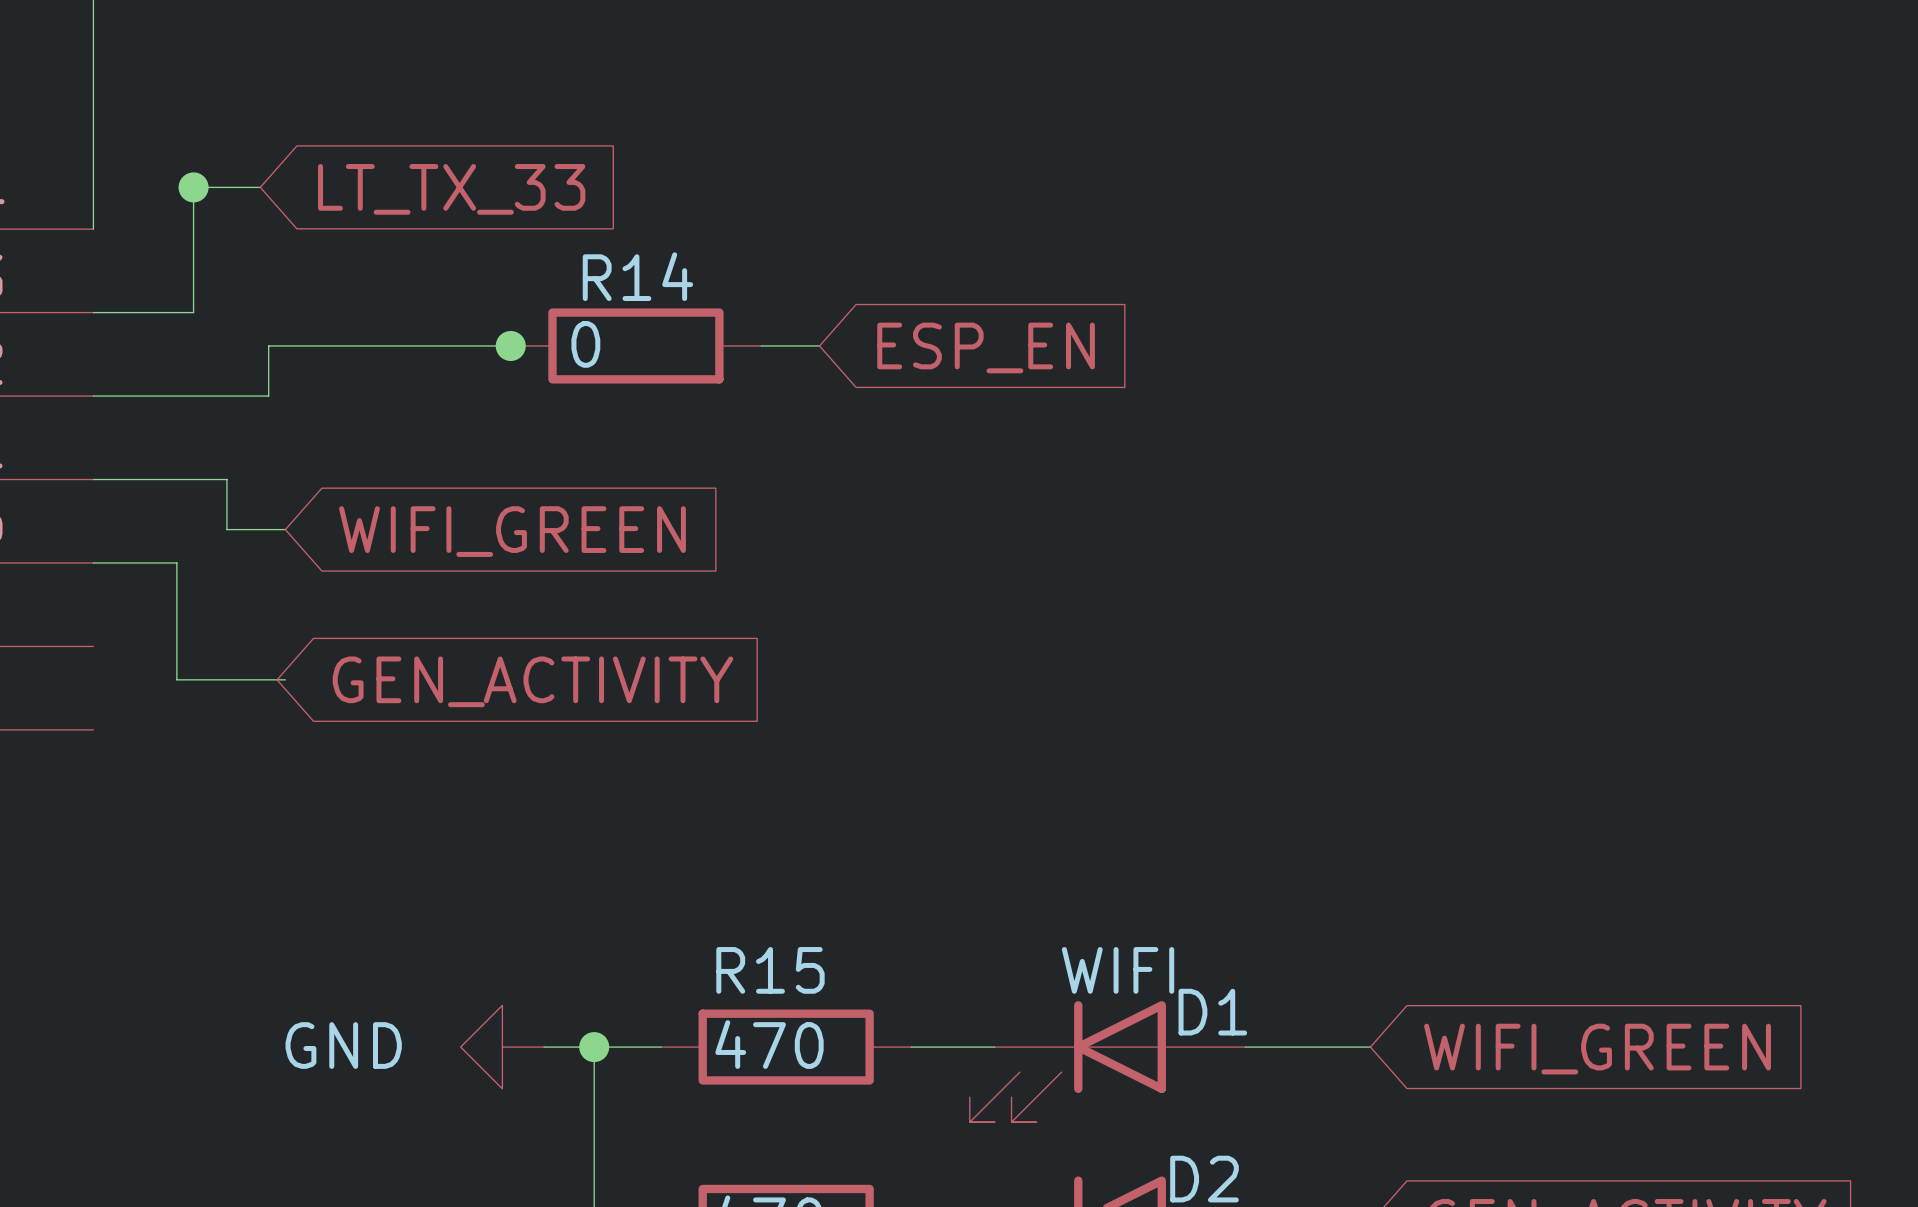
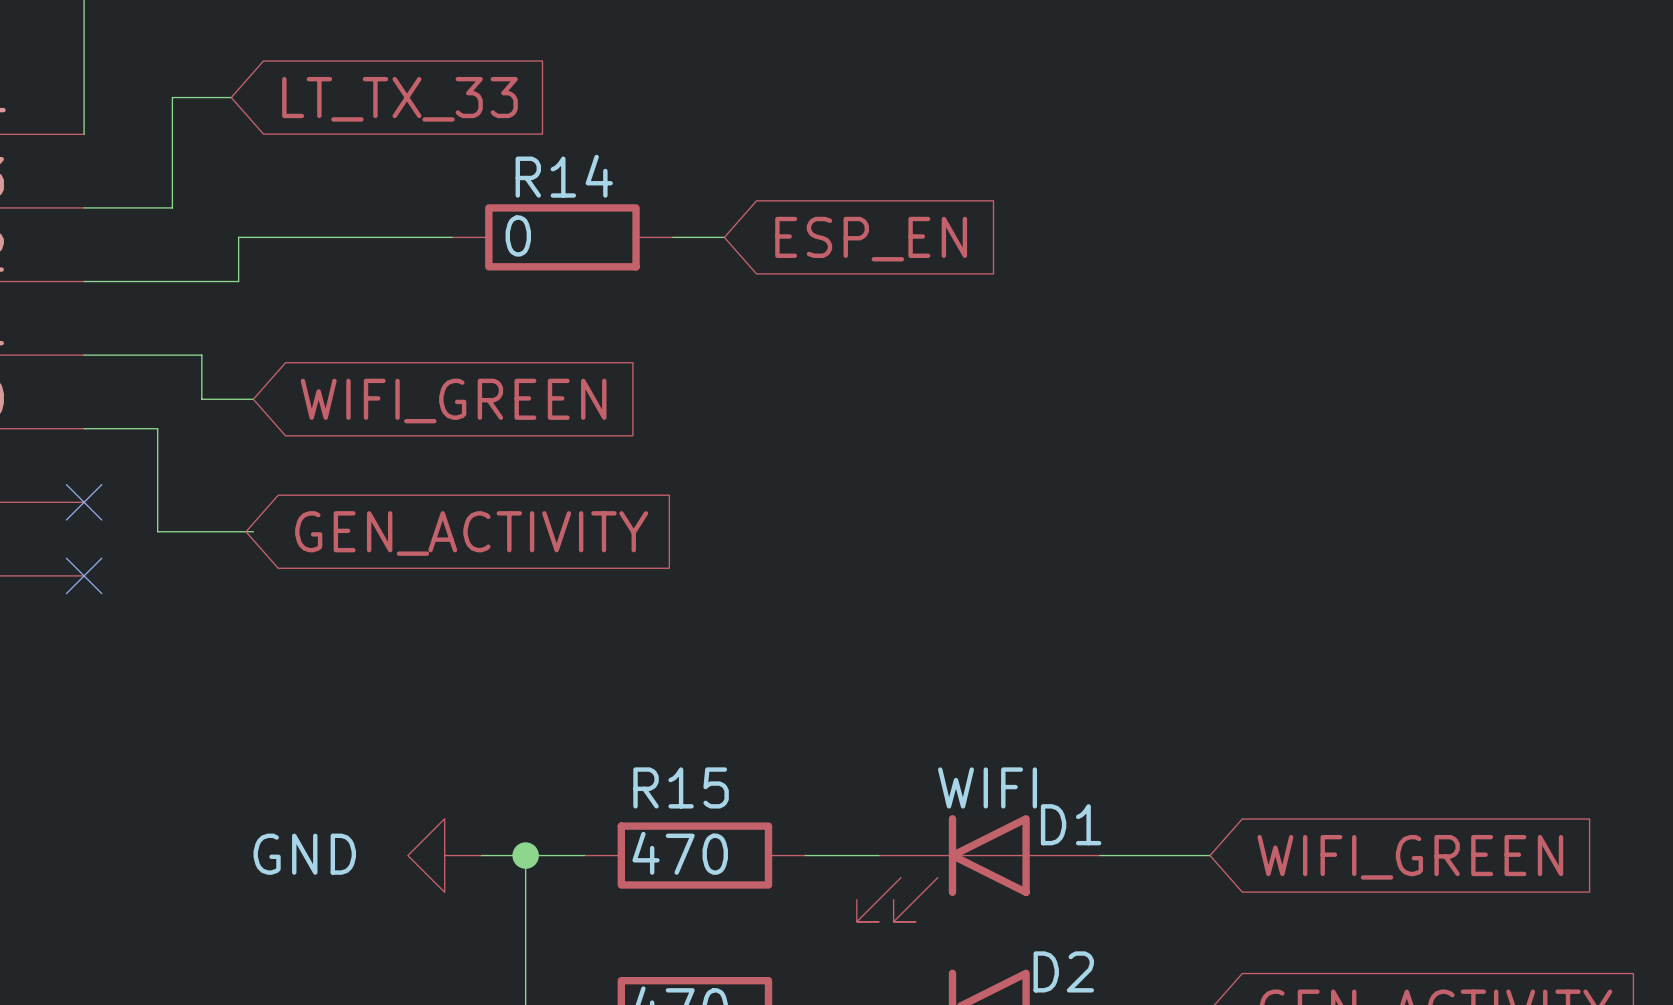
junction: (193, 187) -> none
junction: (510, 345) -> none
no-connect mark: none -> (84, 502)
no-connect mark: none -> (84, 575)

